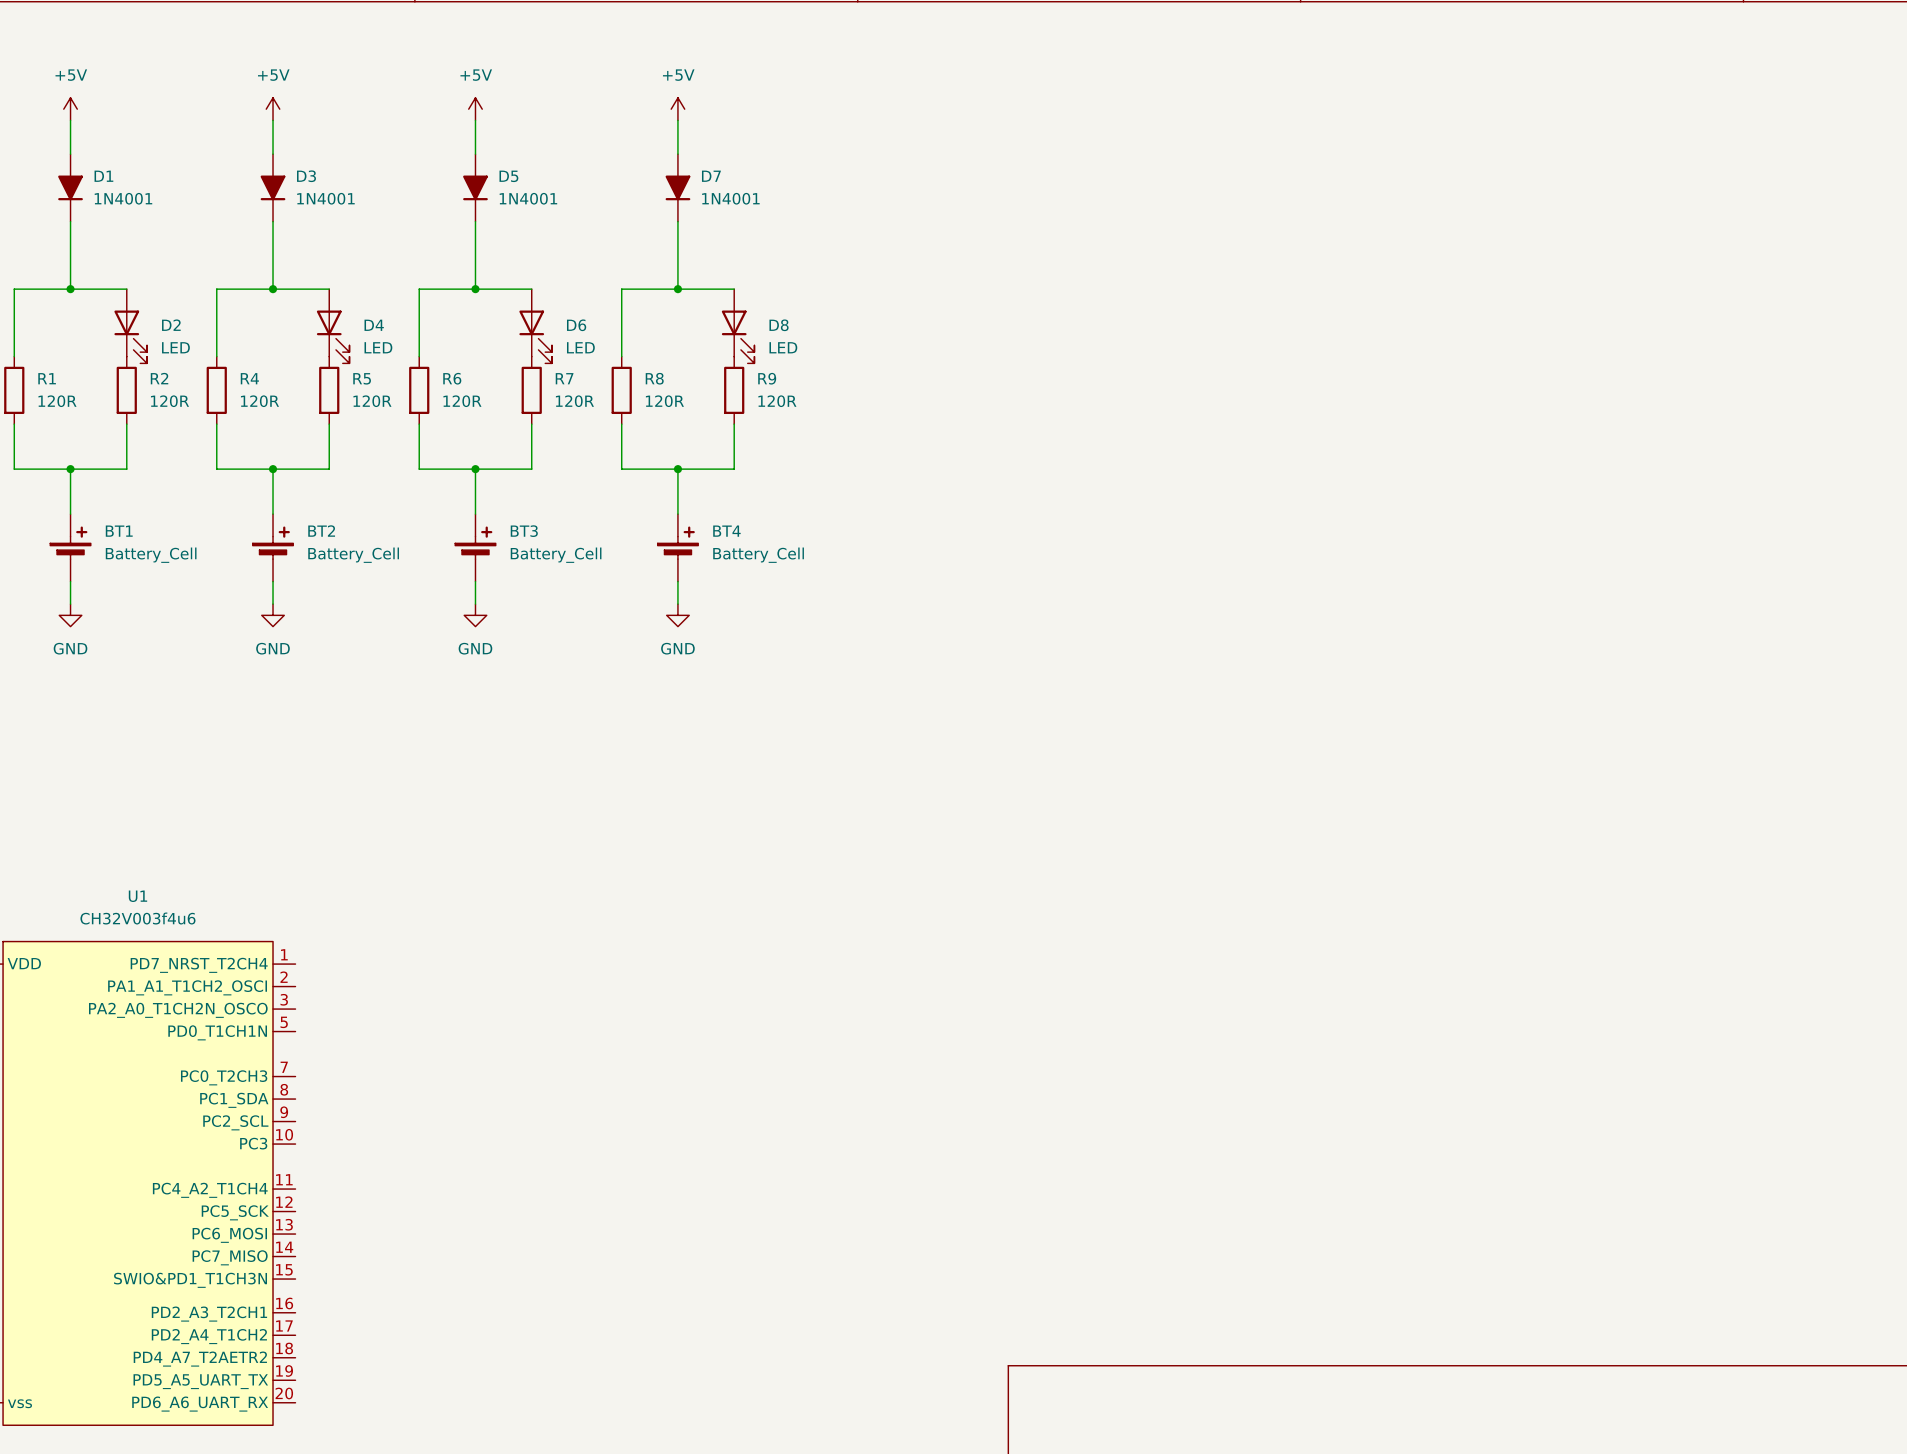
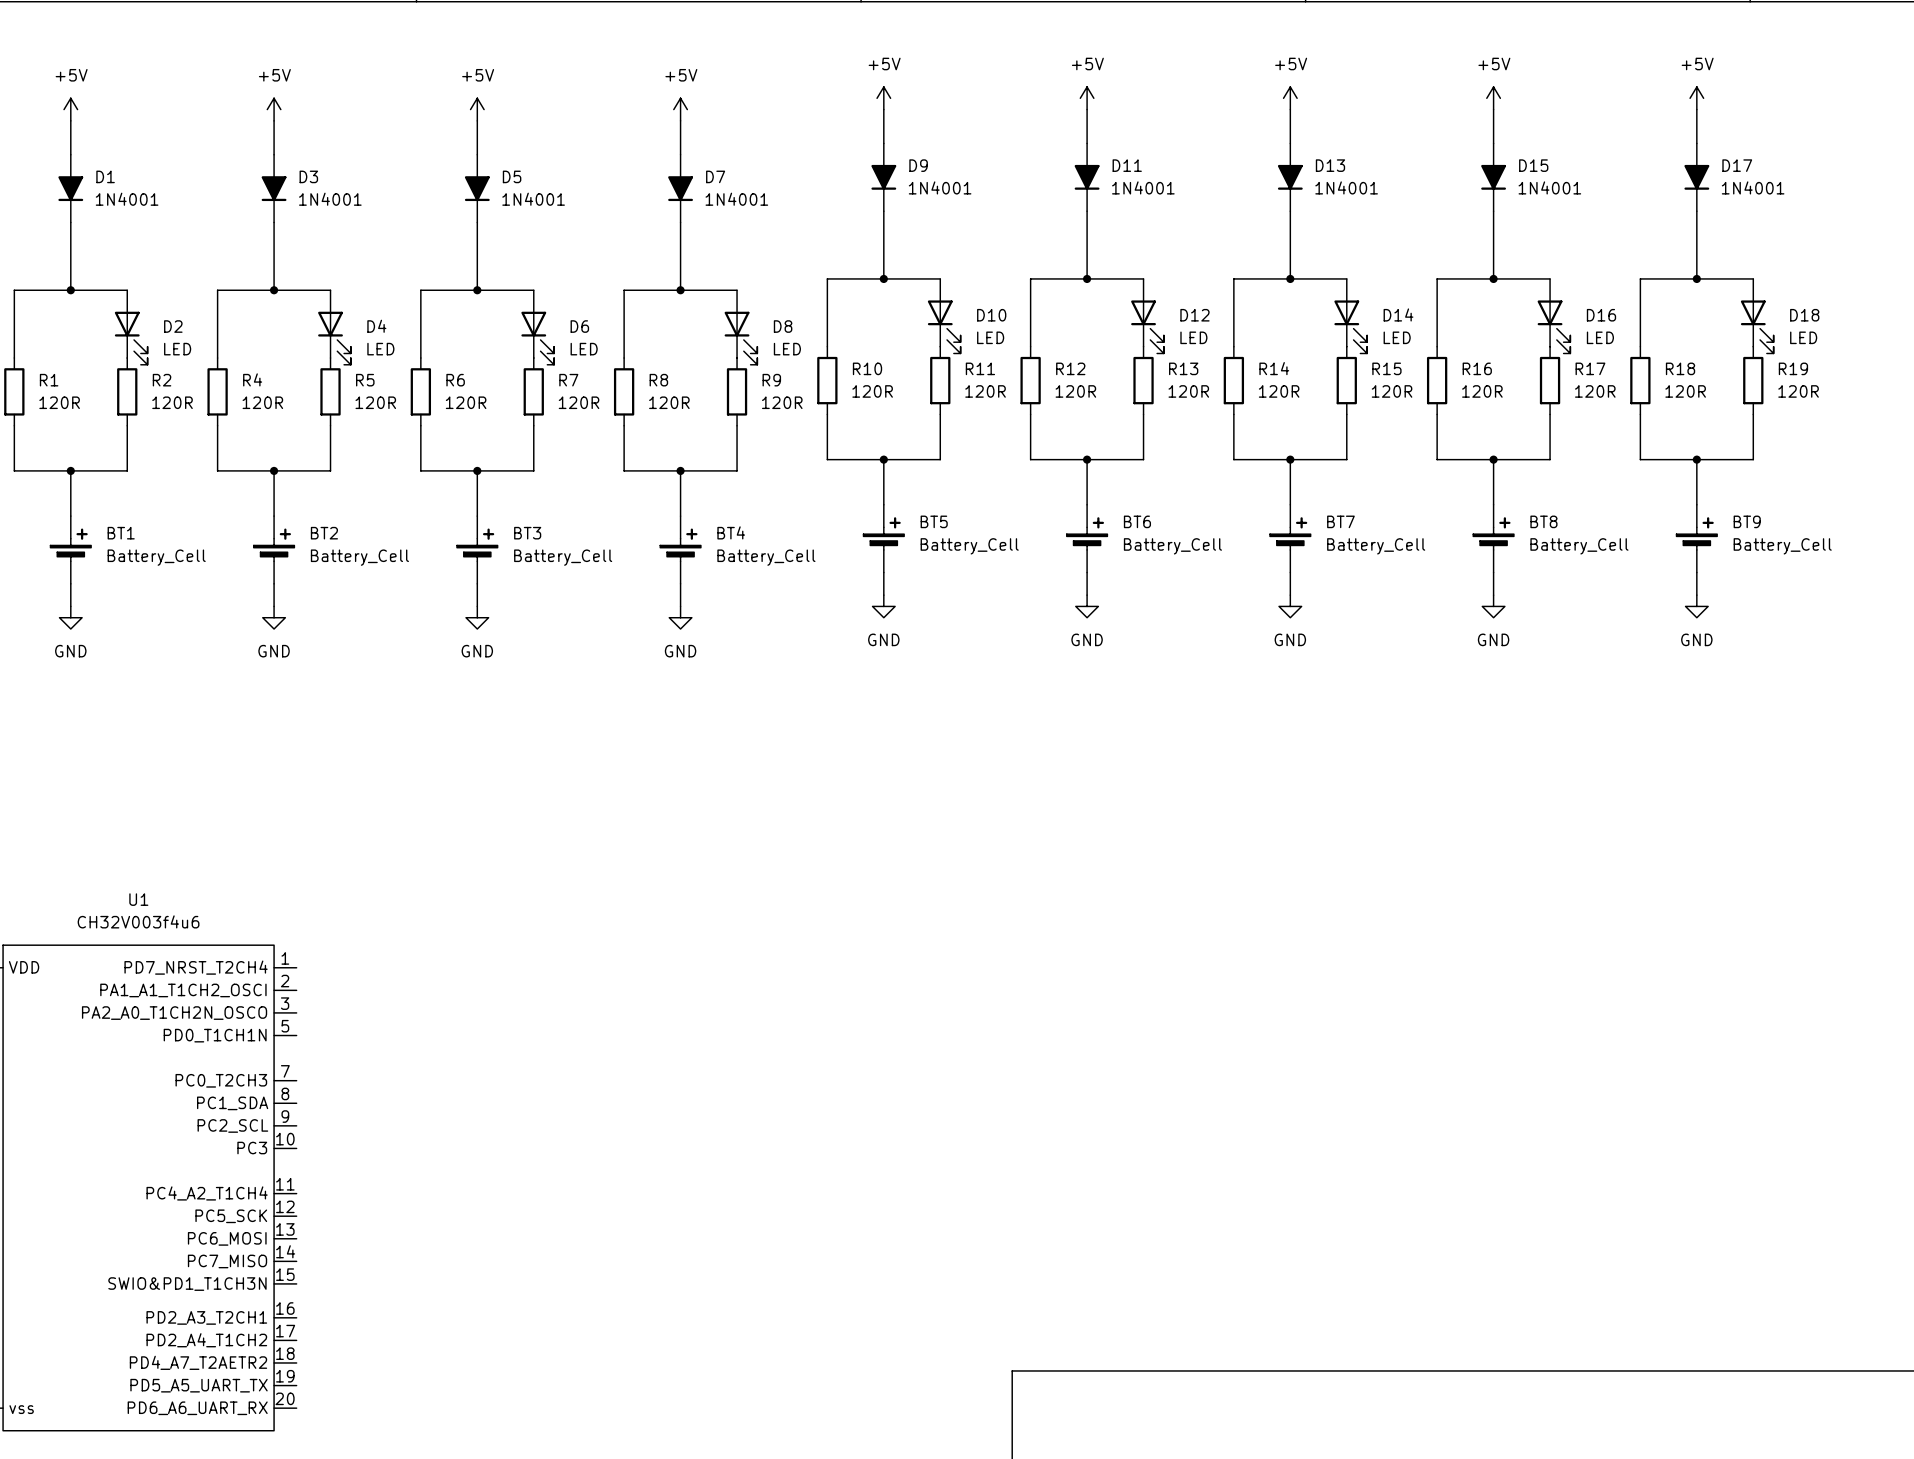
power symbol: none -> +5V (883, 98)
power symbol: none -> +5V (1087, 98)
power symbol: none -> +5V (1290, 98)
power symbol: none -> +5V (1493, 98)
power symbol: none -> +5V (1696, 98)
wire: none -> (883, 109) (883, 143)
wire: none -> (1087, 109) (1087, 143)
wire: none -> (1290, 109) (1290, 143)
wire: none -> (1493, 109) (1493, 143)
wire: none -> (1696, 109) (1696, 143)
D9: none -> 1N4001 (883, 177)
D11: none -> 1N4001 (1087, 177)
D13: none -> 1N4001 (1290, 177)
D15: none -> 1N4001 (1493, 177)
D17: none -> 1N4001 (1696, 177)
wire: none -> (883, 211) (883, 278)
wire: none -> (1087, 211) (1087, 278)
wire: none -> (1290, 211) (1290, 278)
wire: none -> (1493, 211) (1493, 278)
wire: none -> (1696, 211) (1696, 278)
junction: none -> (883, 278)
wire: none -> (940, 278) (827, 278) (827, 346)
junction: none -> (1087, 278)
wire: none -> (1143, 278) (1030, 278) (1030, 346)
junction: none -> (1290, 278)
wire: none -> (1346, 278) (1233, 278) (1233, 346)
junction: none -> (1493, 278)
wire: none -> (1550, 278) (1437, 278) (1437, 346)
junction: none -> (1696, 278)
wire: none -> (1753, 278) (1640, 278) (1640, 346)
D10: none -> LED (944, 316)
D12: none -> LED (1147, 316)
D14: none -> LED (1350, 316)
D16: none -> LED (1553, 316)
D18: none -> LED (1757, 316)
R10: none -> 120R (827, 380)
R11: none -> 120R (940, 380)
R12: none -> 120R (1030, 380)
R13: none -> 120R (1143, 380)
R14: none -> 120R (1233, 380)
R15: none -> 120R (1346, 380)
R16: none -> 120R (1437, 380)
R17: none -> 120R (1550, 380)
R18: none -> 120R (1640, 380)
R19: none -> 120R (1753, 380)
wire: none -> (827, 414) (827, 459) (940, 459) (940, 414)
wire: none -> (1030, 414) (1030, 459) (1143, 459) (1143, 414)
wire: none -> (1233, 414) (1233, 459) (1346, 459) (1346, 414)
wire: none -> (1437, 414) (1437, 459) (1550, 459) (1550, 414)
wire: none -> (1640, 414) (1640, 459) (1753, 459) (1753, 414)
wire: none -> (883, 459) (883, 504)
junction: none -> (883, 459)
wire: none -> (1087, 459) (1087, 504)
junction: none -> (1087, 459)
wire: none -> (1290, 459) (1290, 504)
junction: none -> (1290, 459)
wire: none -> (1493, 459) (1493, 504)
junction: none -> (1493, 459)
wire: none -> (1696, 459) (1696, 504)
junction: none -> (1696, 459)
BT5: none -> Battery_Cell (883, 538)
BT6: none -> Battery_Cell (1087, 538)
BT7: none -> Battery_Cell (1290, 538)
BT8: none -> Battery_Cell (1493, 538)
BT9: none -> Battery_Cell (1696, 538)
wire: none -> (883, 572) (883, 595)
wire: none -> (1087, 572) (1087, 595)
wire: none -> (1290, 572) (1290, 595)
wire: none -> (1493, 572) (1493, 595)
wire: none -> (1696, 572) (1696, 595)
power symbol: none -> GND (883, 606)
power symbol: none -> GND (1087, 606)
power symbol: none -> GND (1290, 606)
power symbol: none -> GND (1493, 606)
power symbol: none -> GND (1696, 606)

